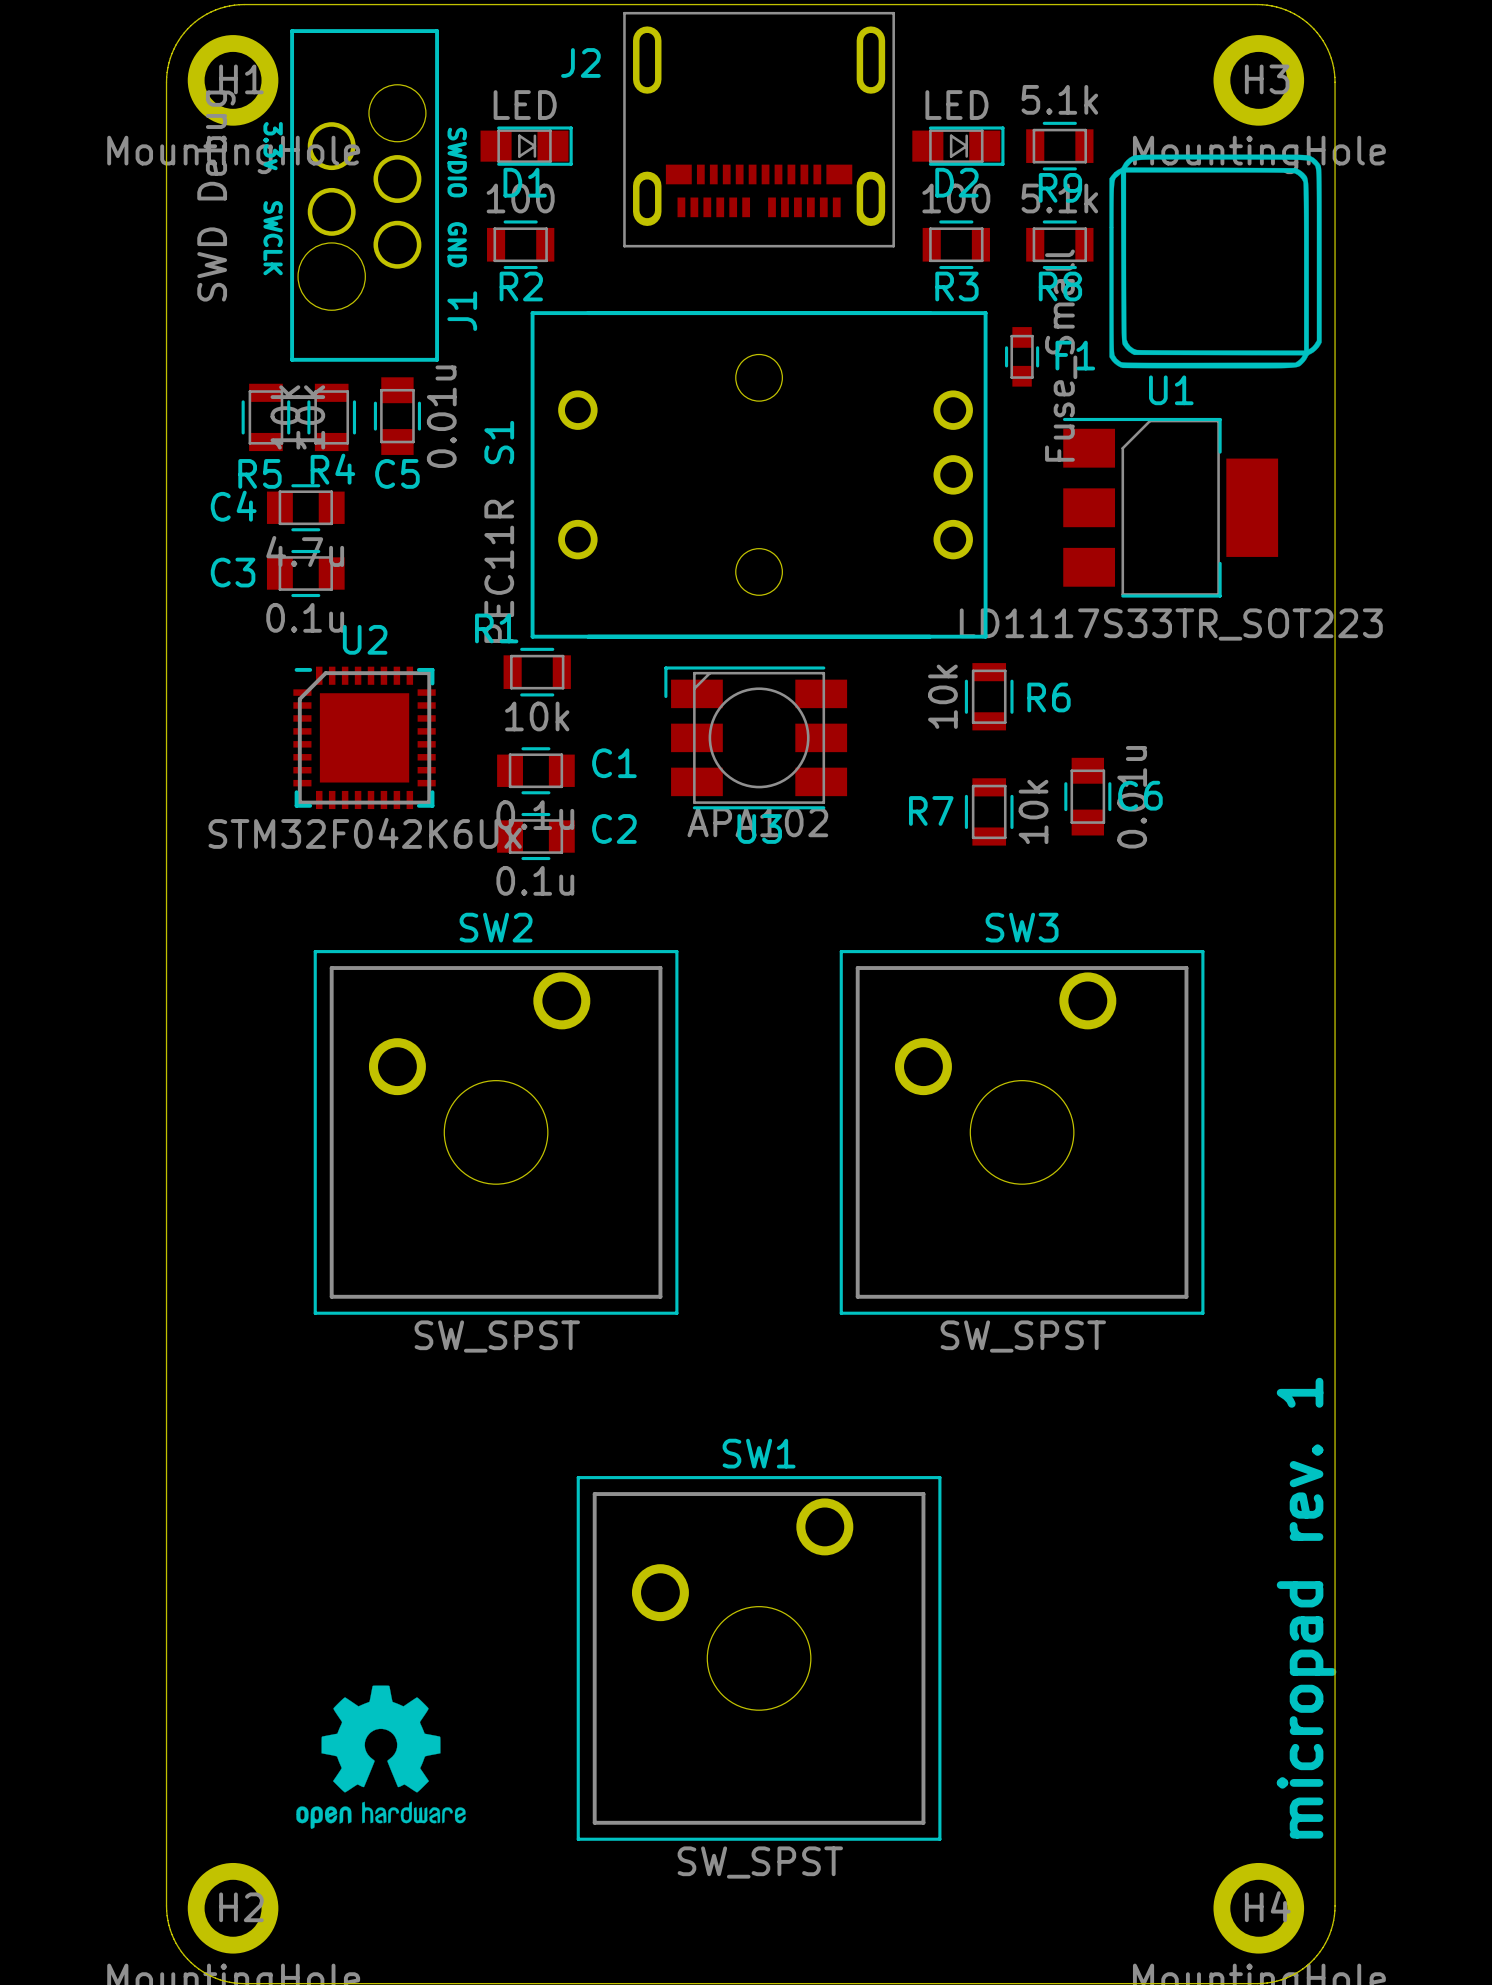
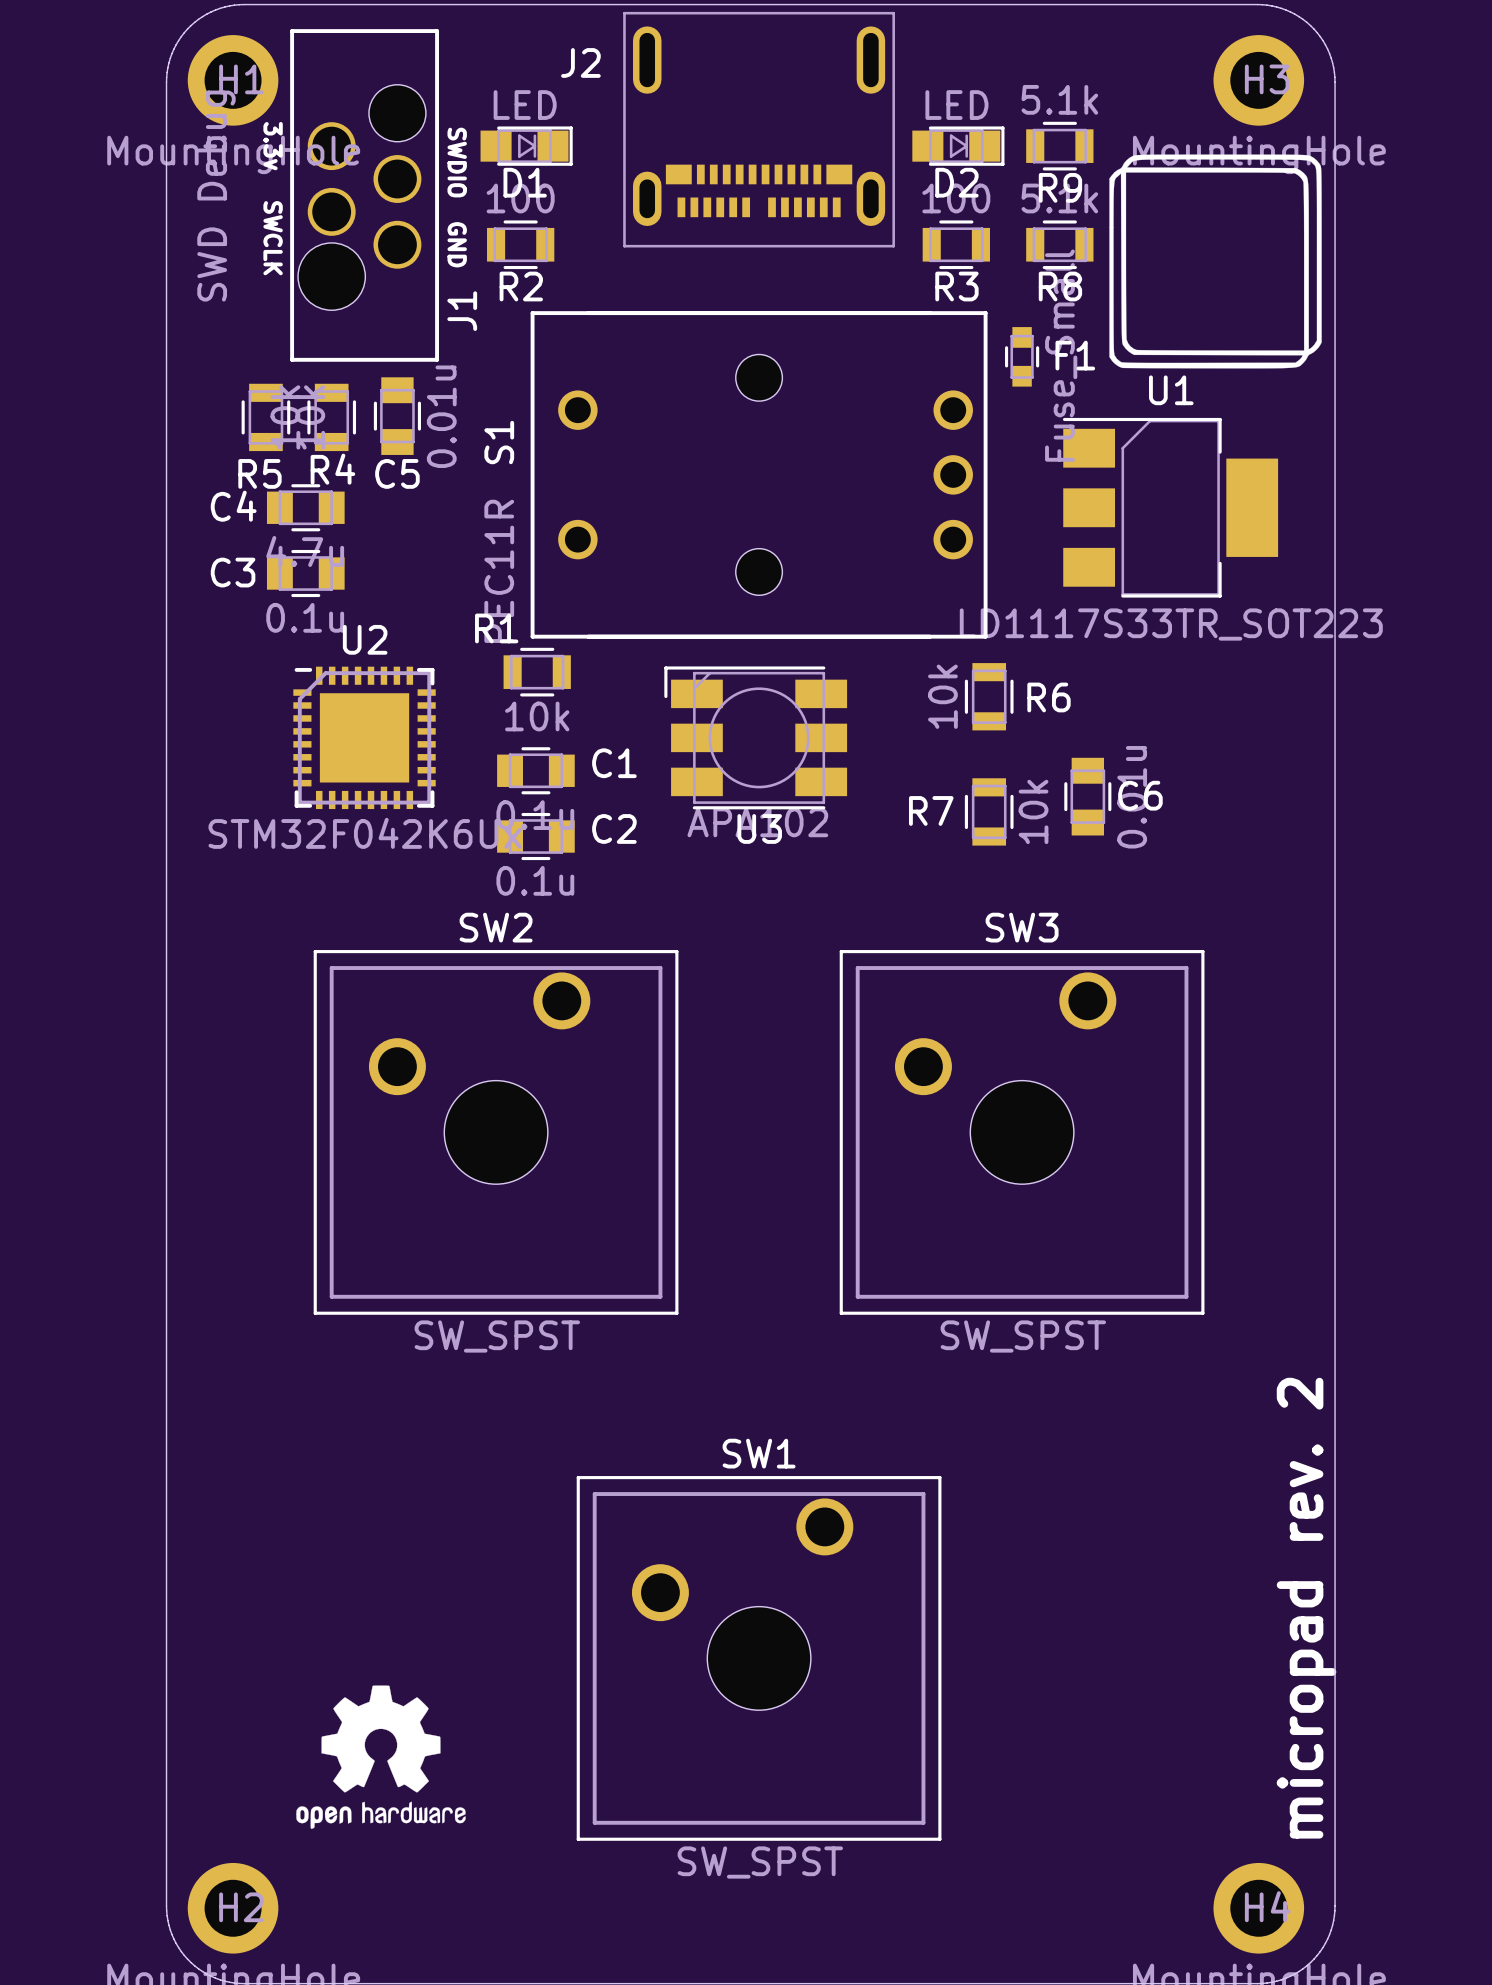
text: micropad rev. 1 (1306, 1608) -> micropad rev. 2 (1306, 1608)

